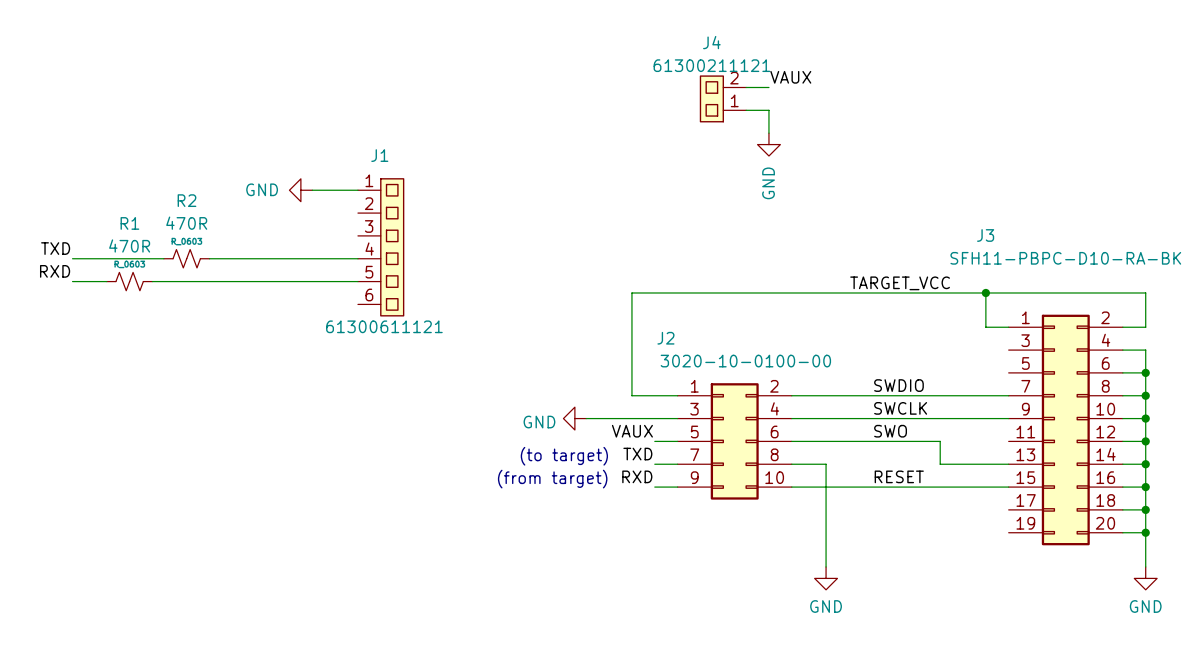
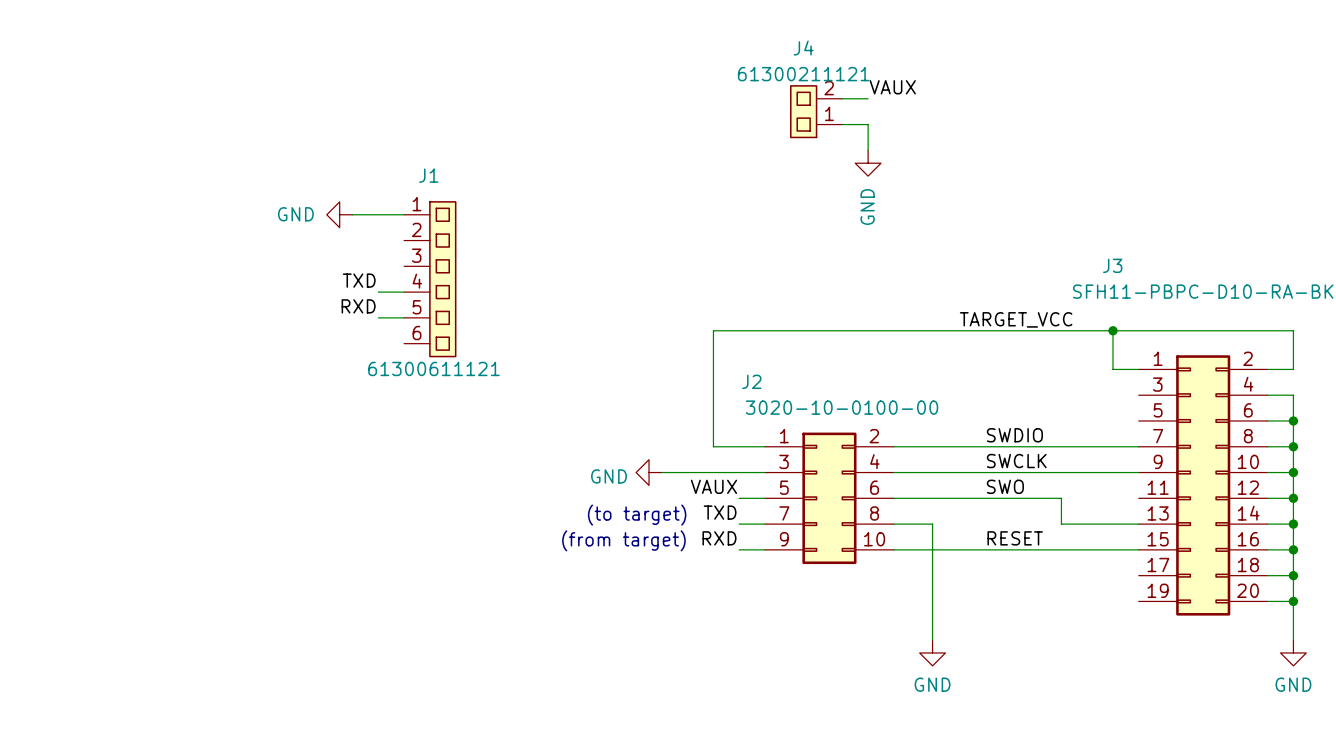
label: TXD (55, 248) -> none
label: none -> TXD (359, 280)
wire: (72, 258) (163, 258) -> none
R2: 470R (186, 258) -> none
wire: (209, 258) (335, 258) -> none
label: RXD (55, 271) -> none
label: none -> RXD (358, 306)
wire: (72, 281) (106, 281) -> none
R1: 470R (129, 281) -> none
wire: (152, 281) (335, 281) -> none

